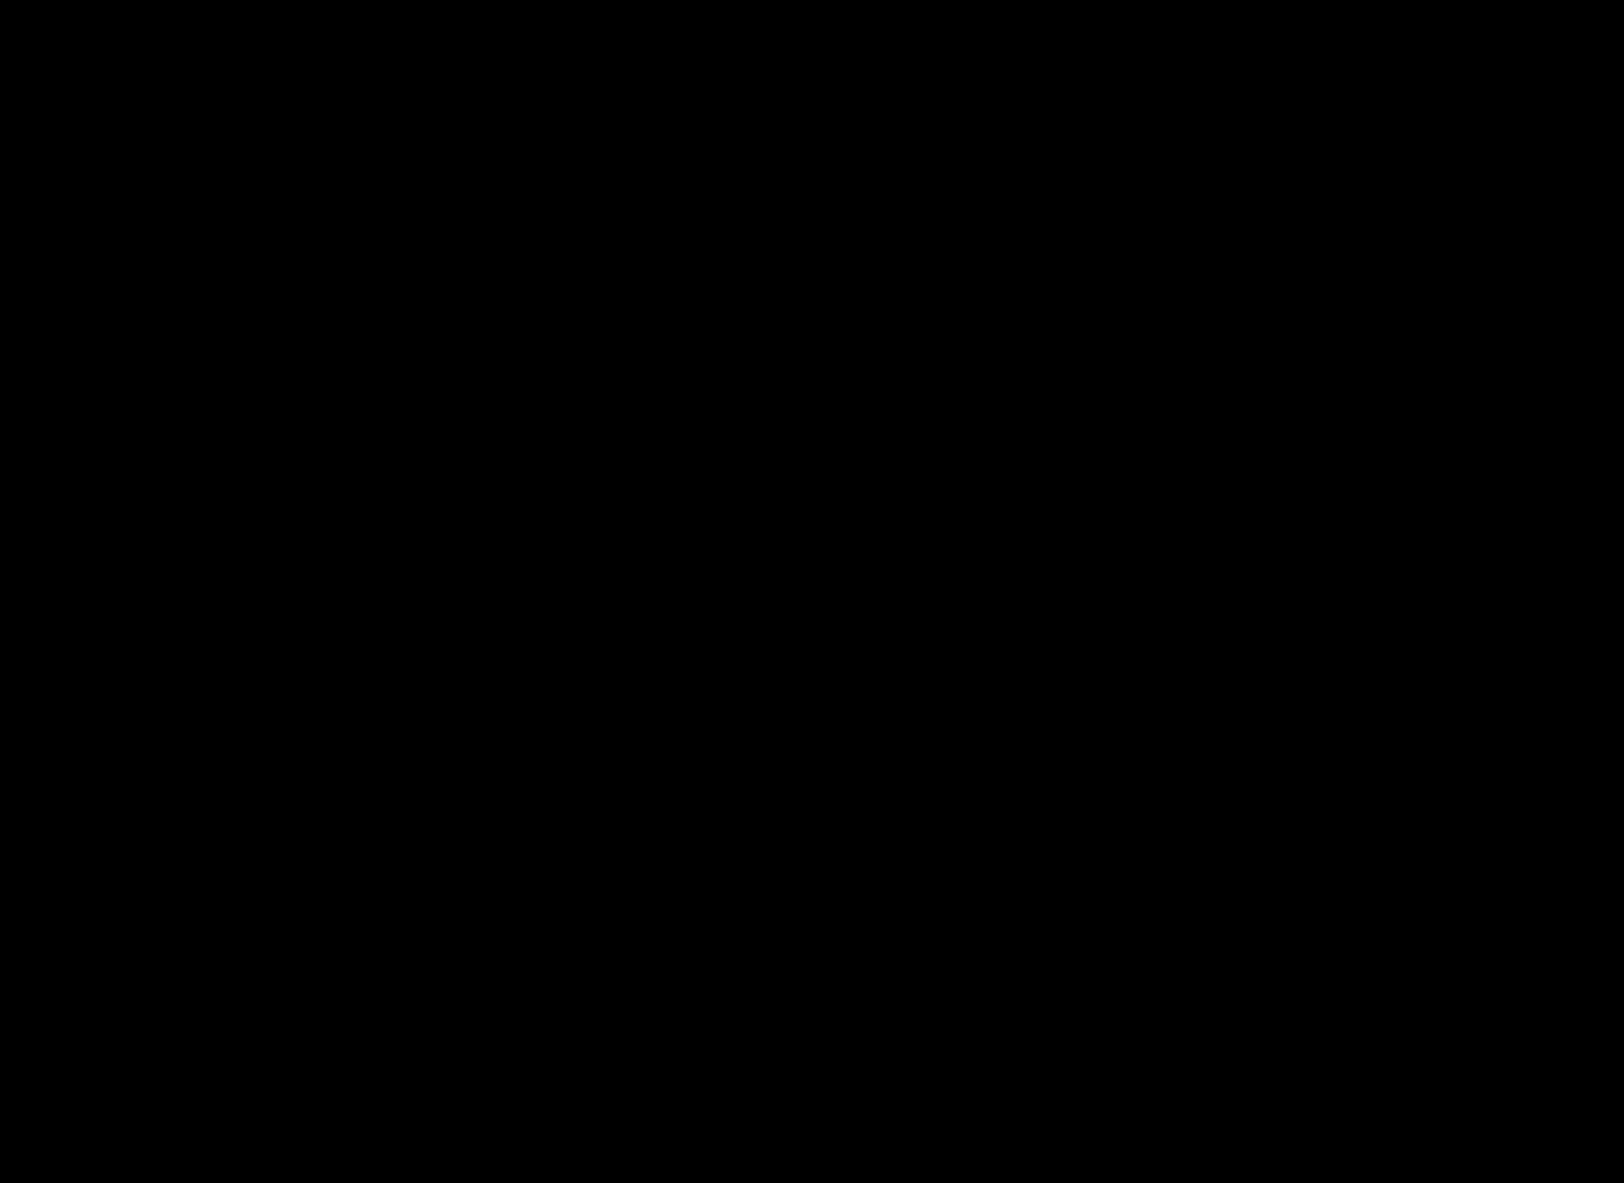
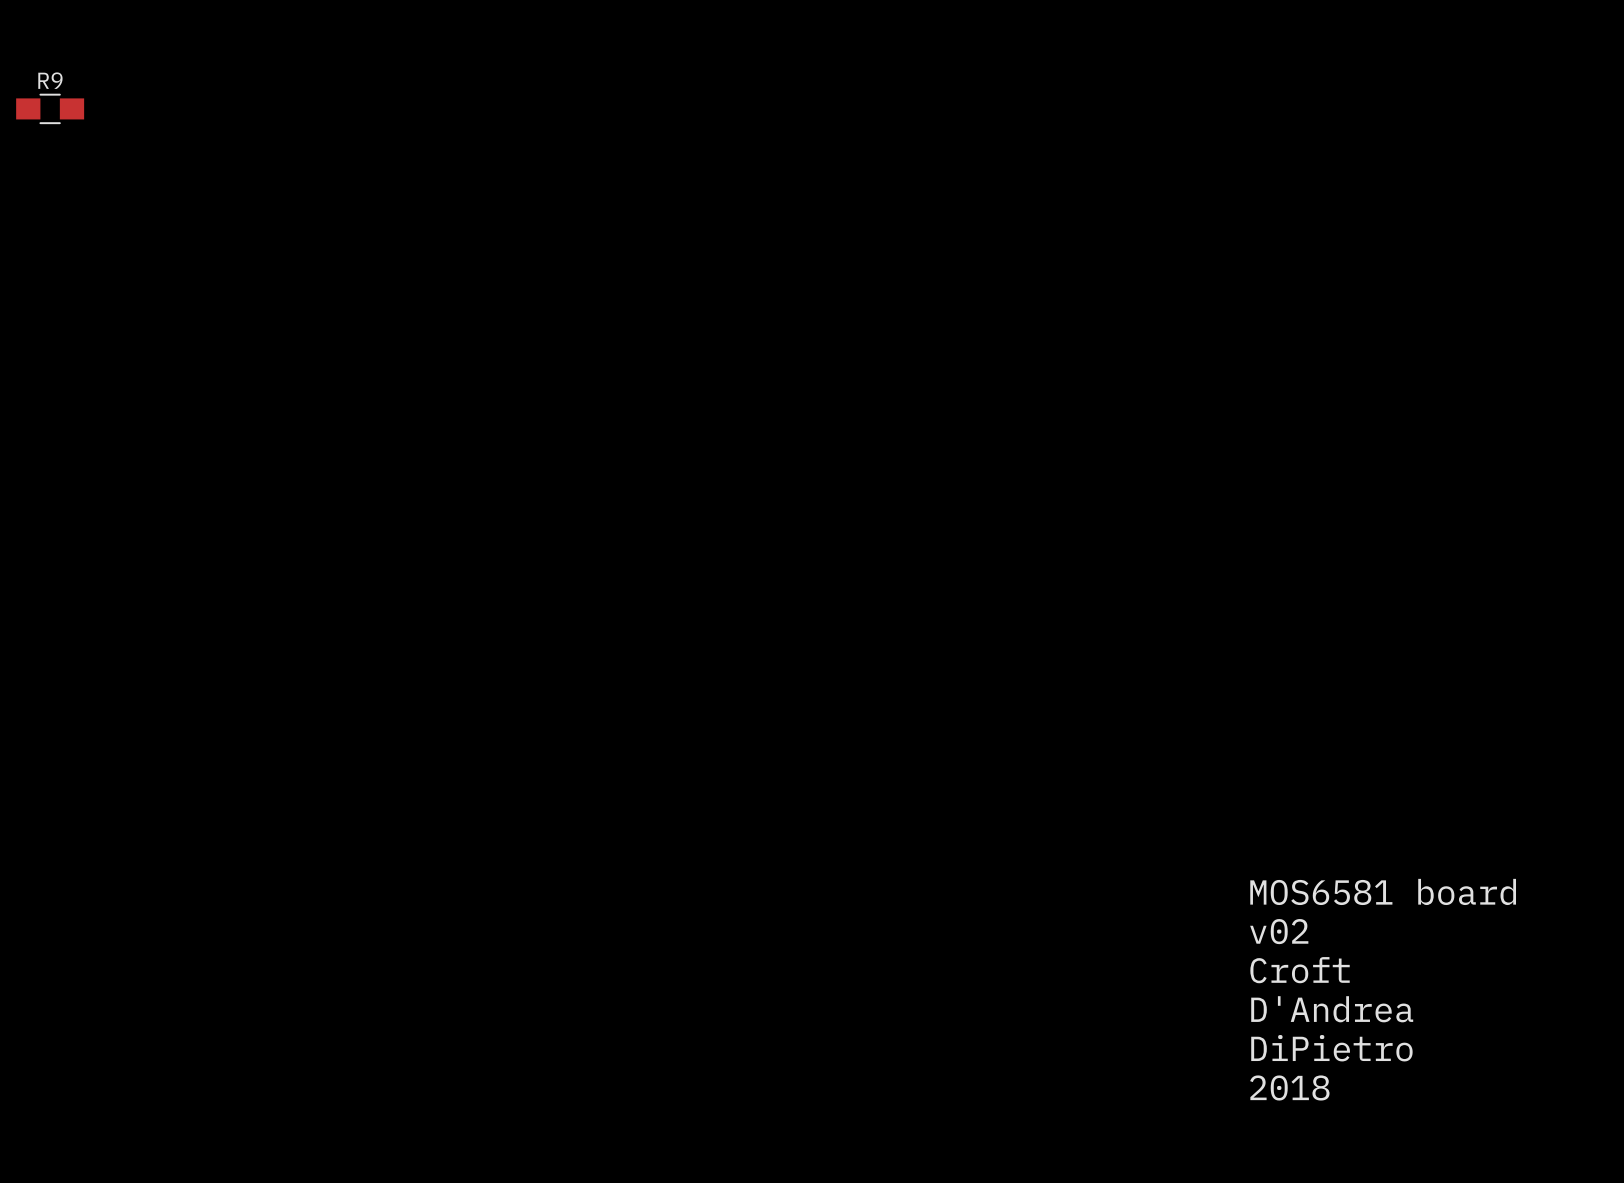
R9: none -> (50, 108)
text: none -> MOS6581 board (1383, 891)
text: none -> v02 (1279, 931)
text: none -> Croft (1300, 970)
text: none -> D'Andrea (1332, 1009)
text: none -> DiPietro (1331, 1048)
text: none -> 2018 (1289, 1087)

